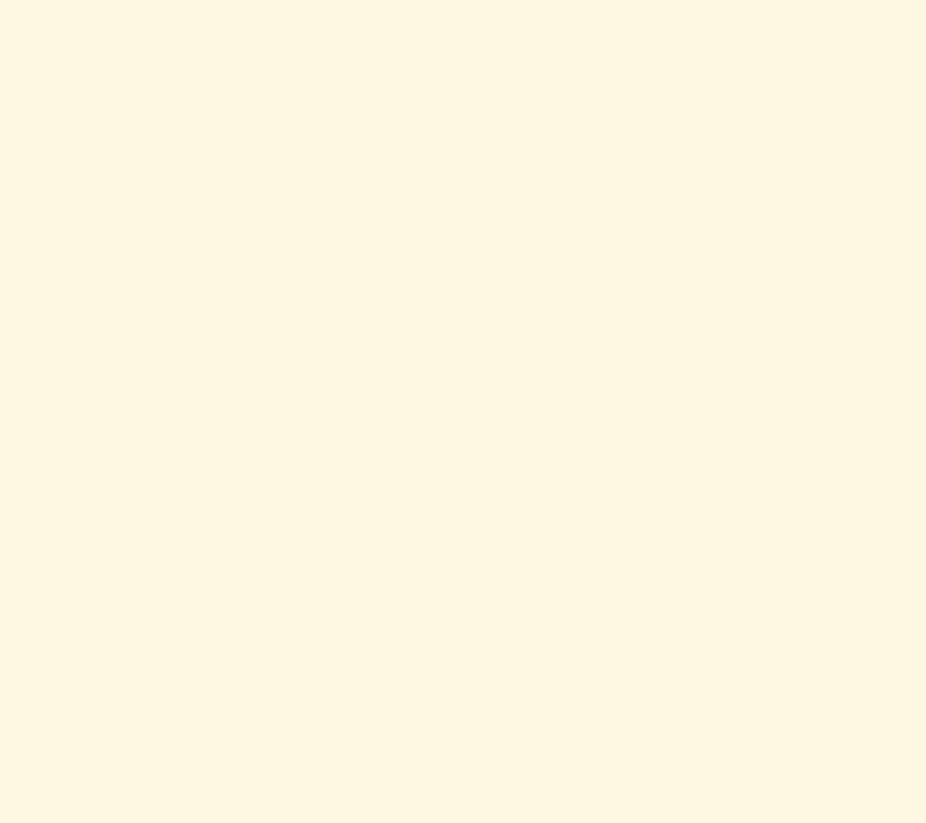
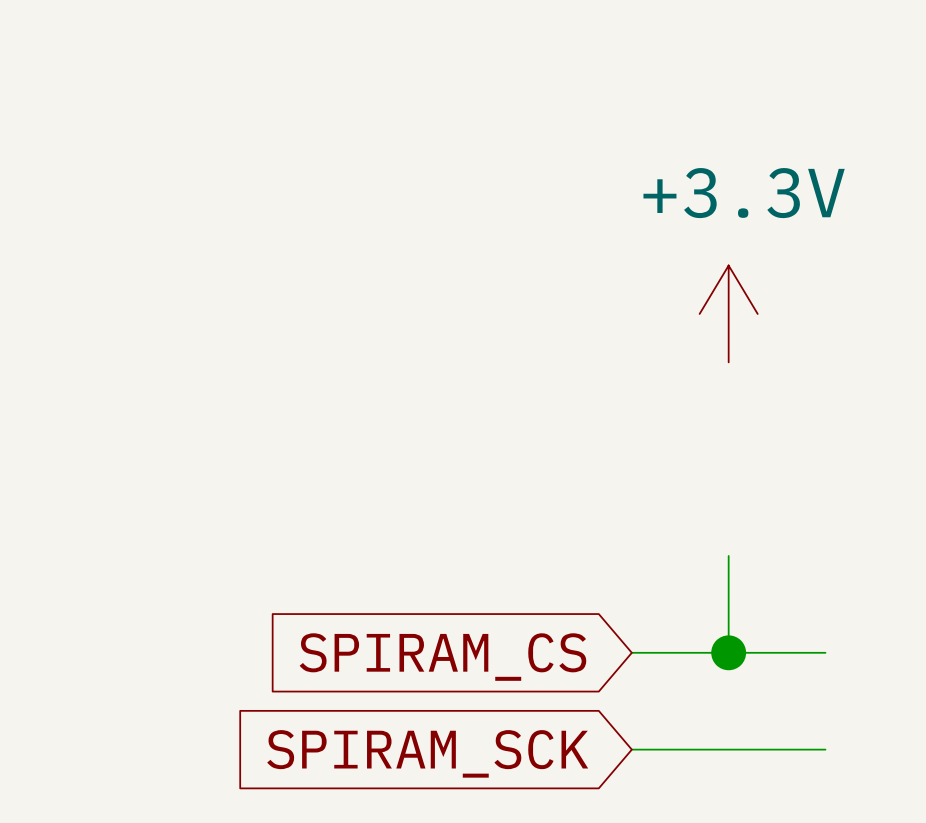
power symbol: none -> +3.3V (728, 313)
wire: none -> (728, 555) (728, 652)
wire: none -> (631, 652) (825, 652)
junction: none -> (728, 652)
global label: none -> SPIRAM_CS (442, 657)
wire: none -> (631, 749) (825, 749)
global label: none -> SPIRAM_SCK (427, 753)

